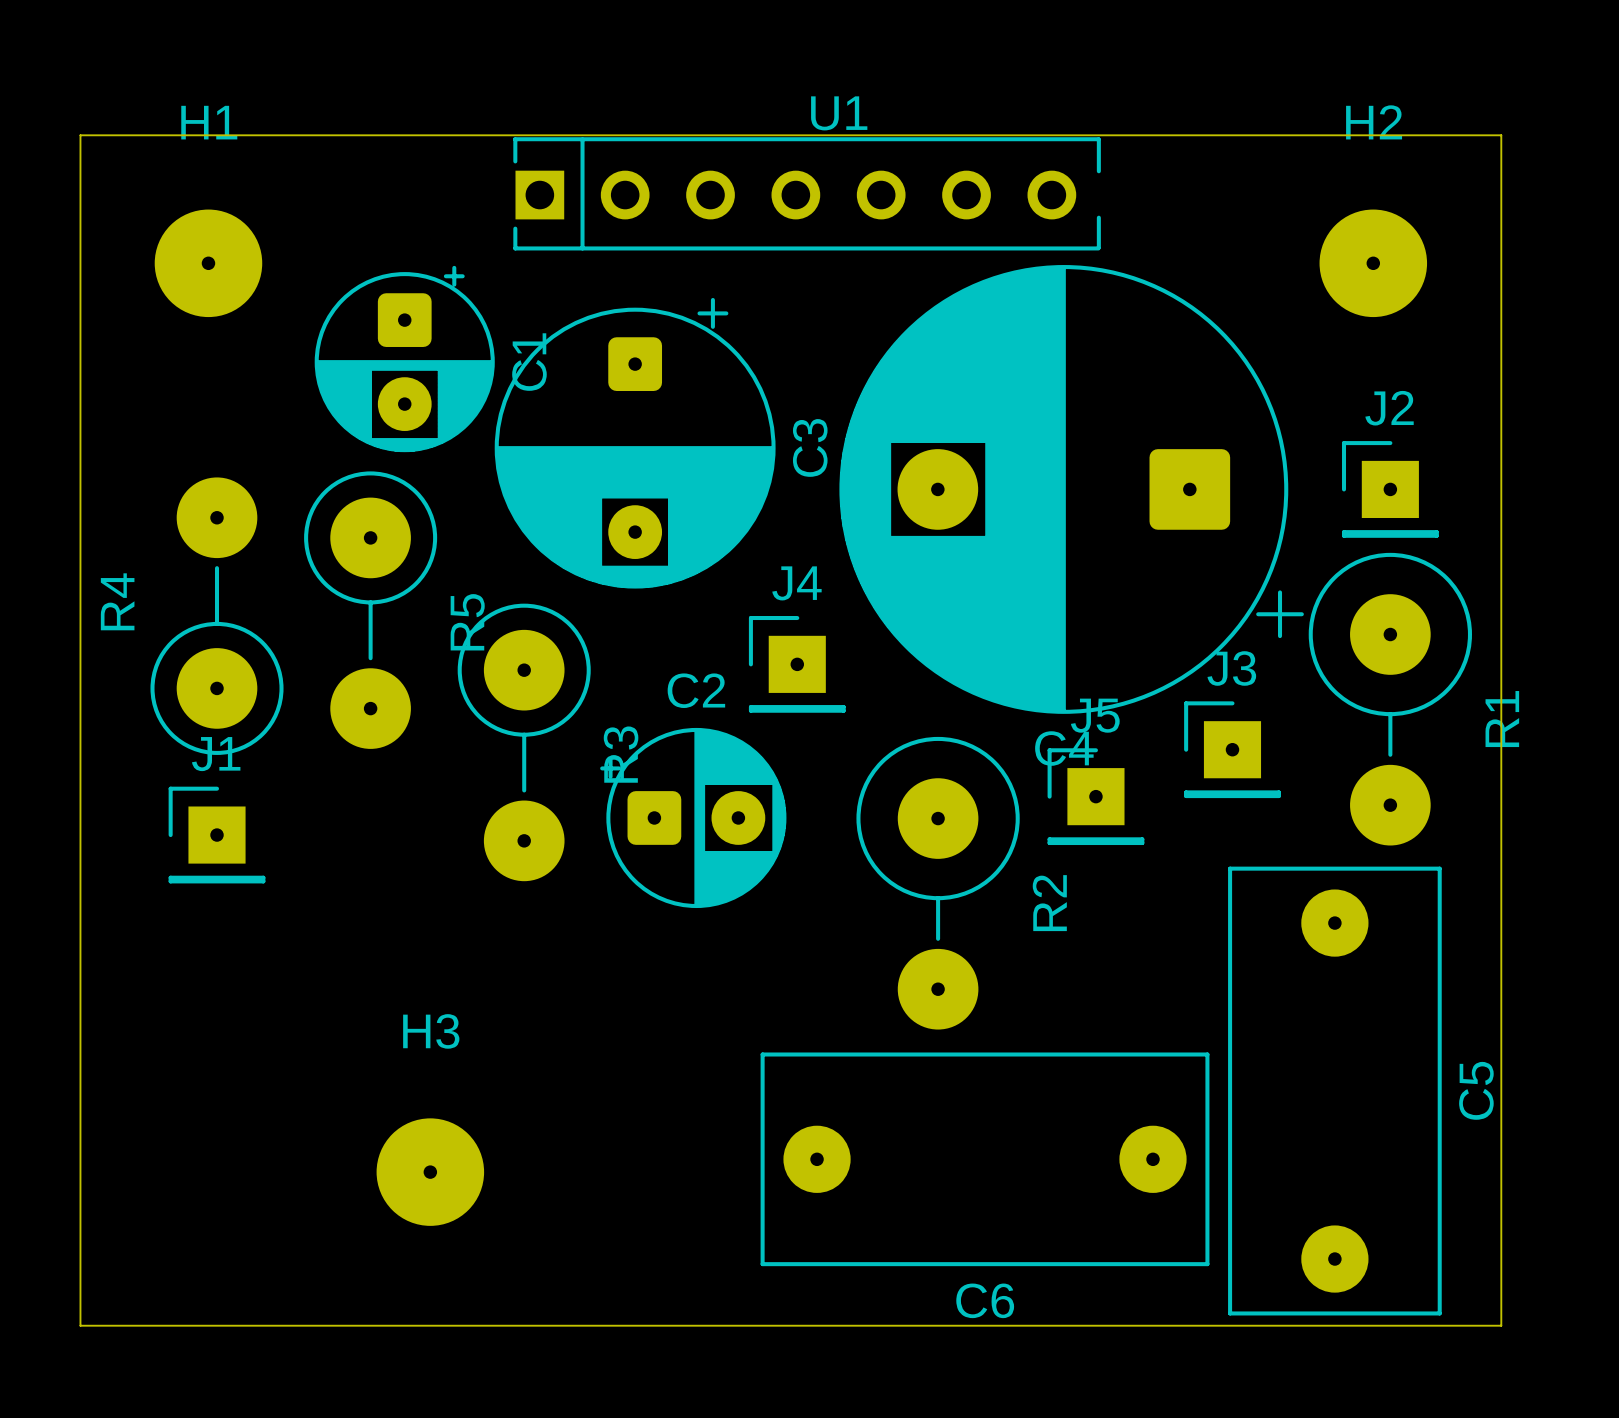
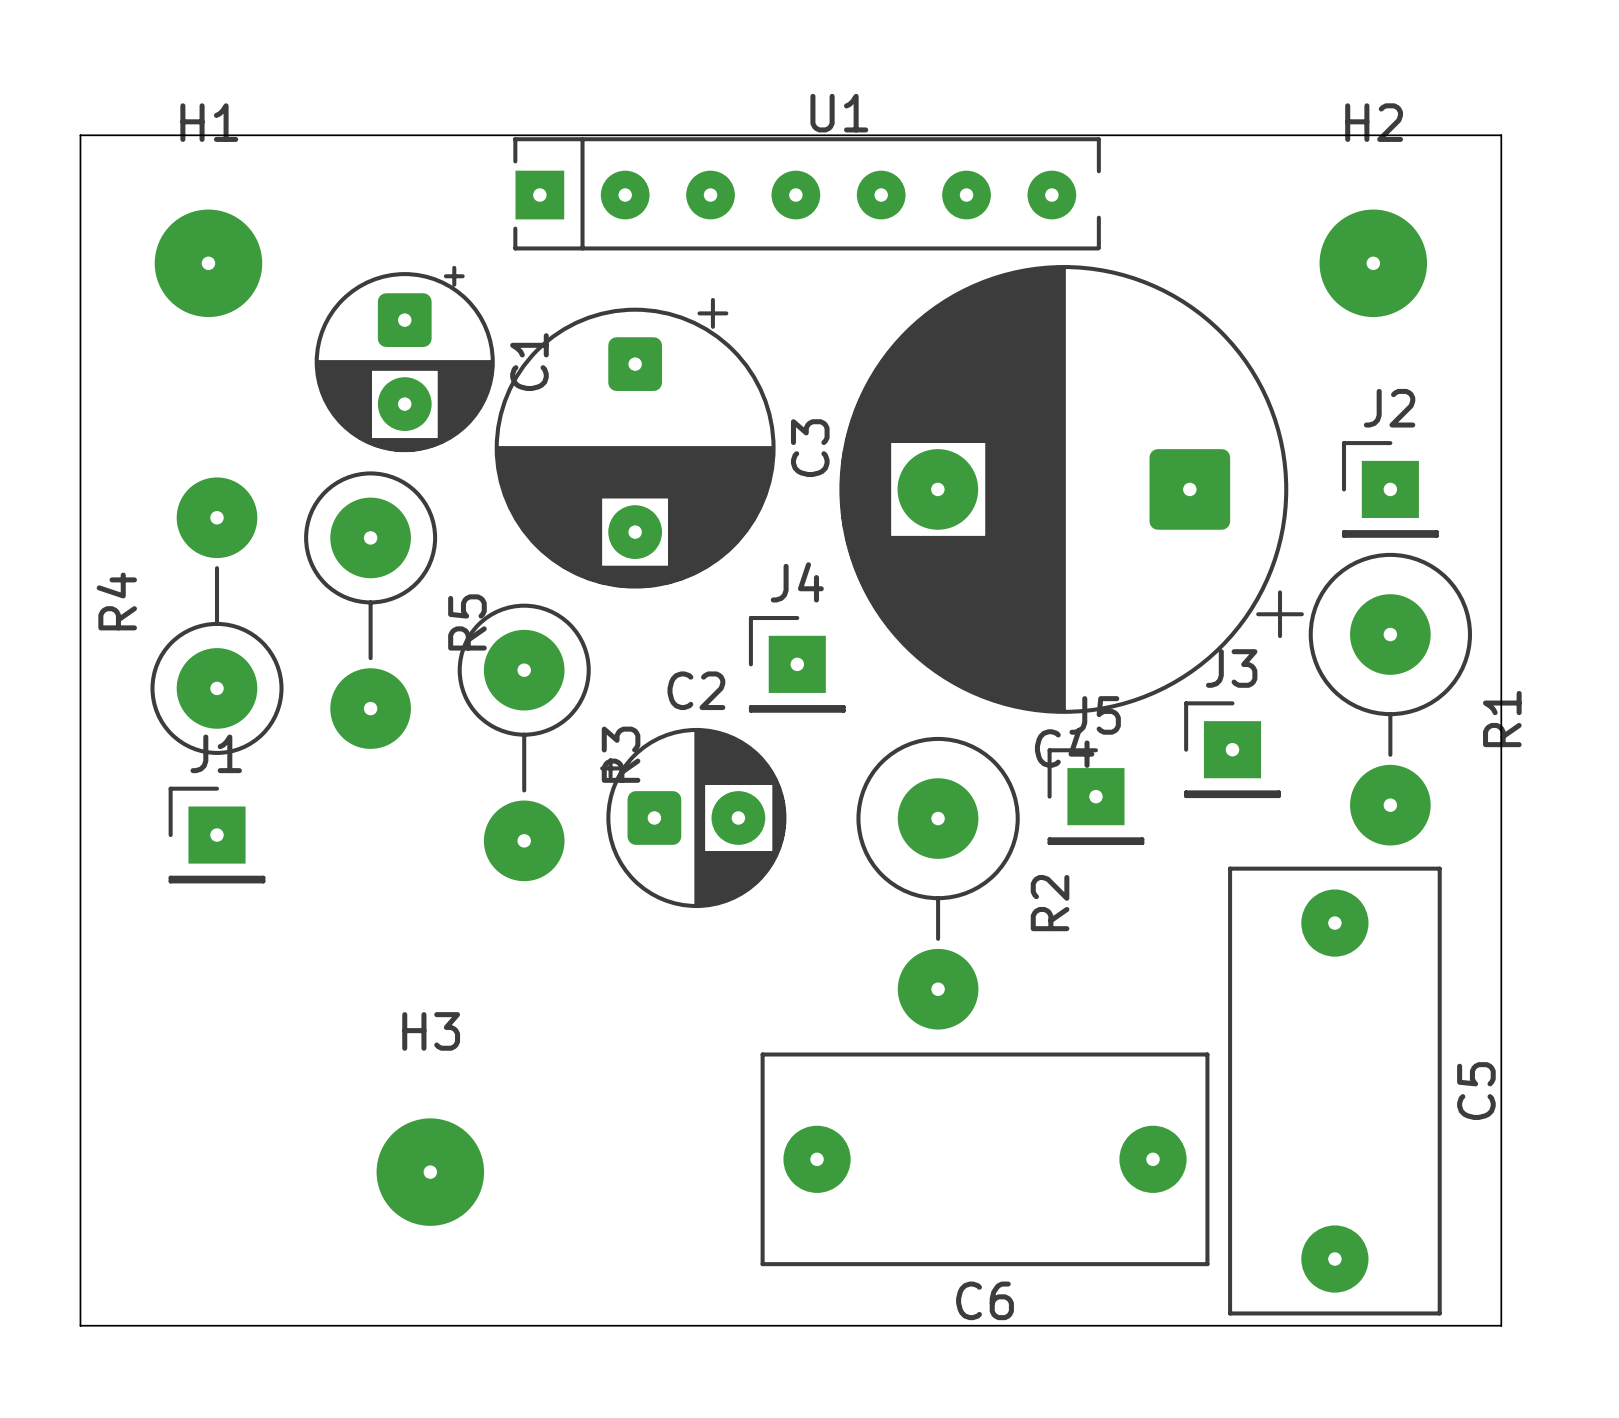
U1 footprint: [512, 137, 1101, 251] -> [512, 137, 1101, 251]

